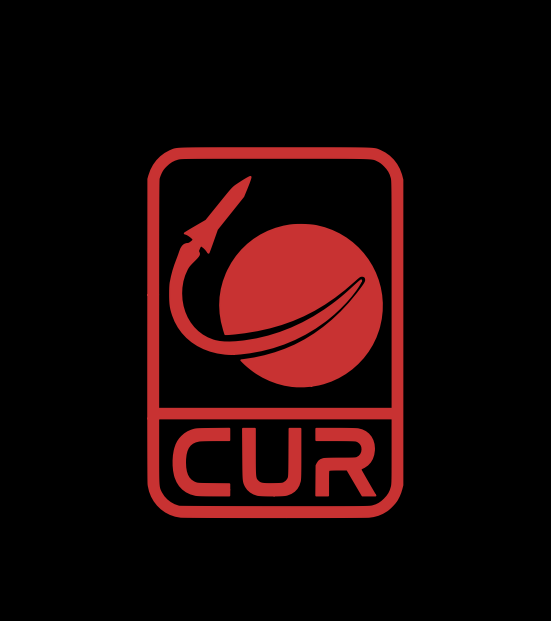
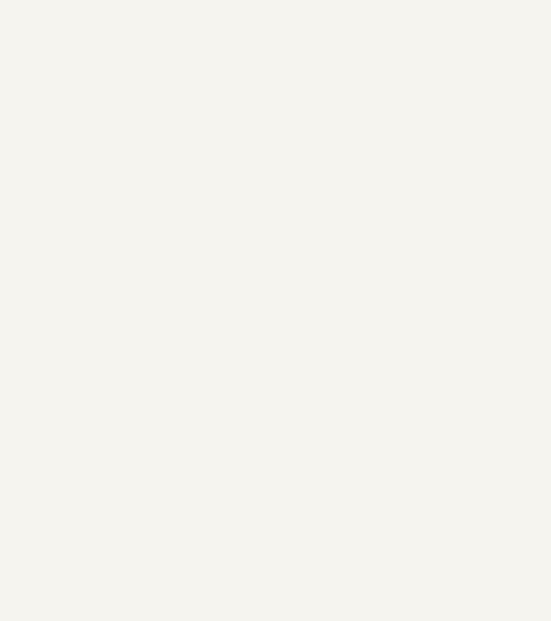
power symbol: (275, 332) -> none

